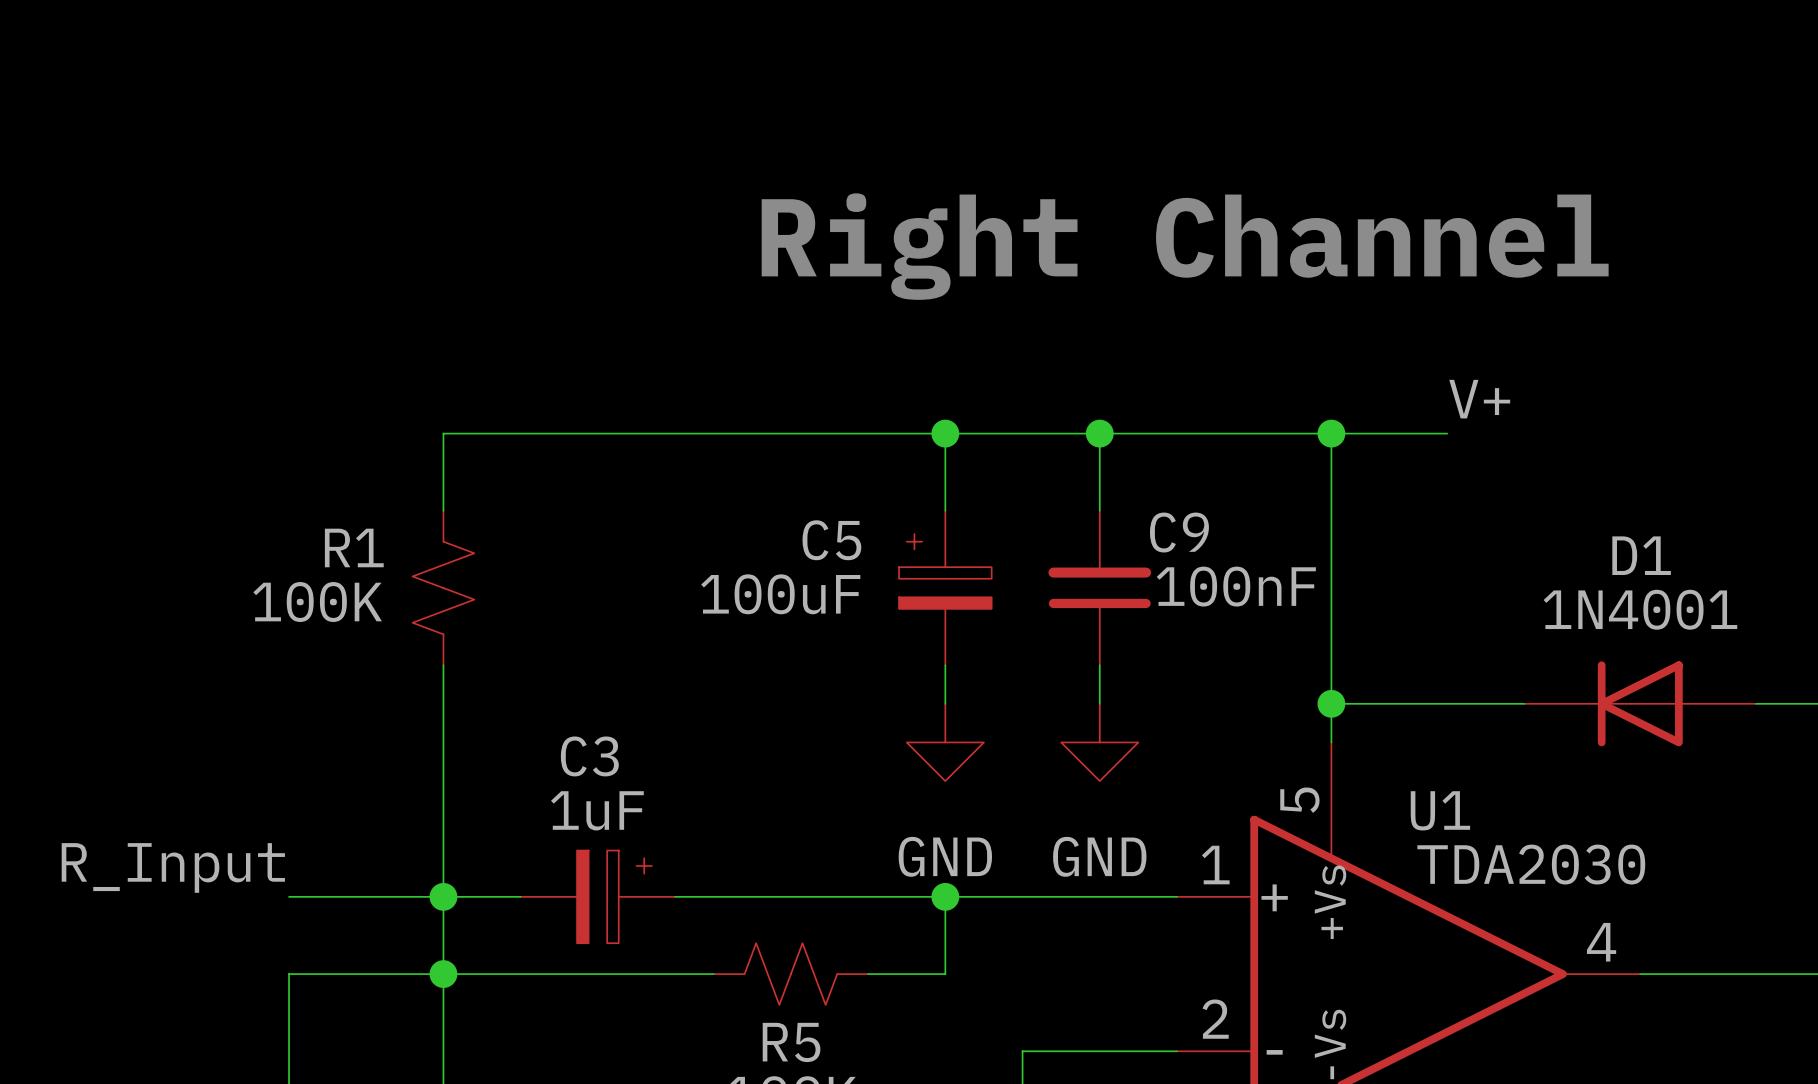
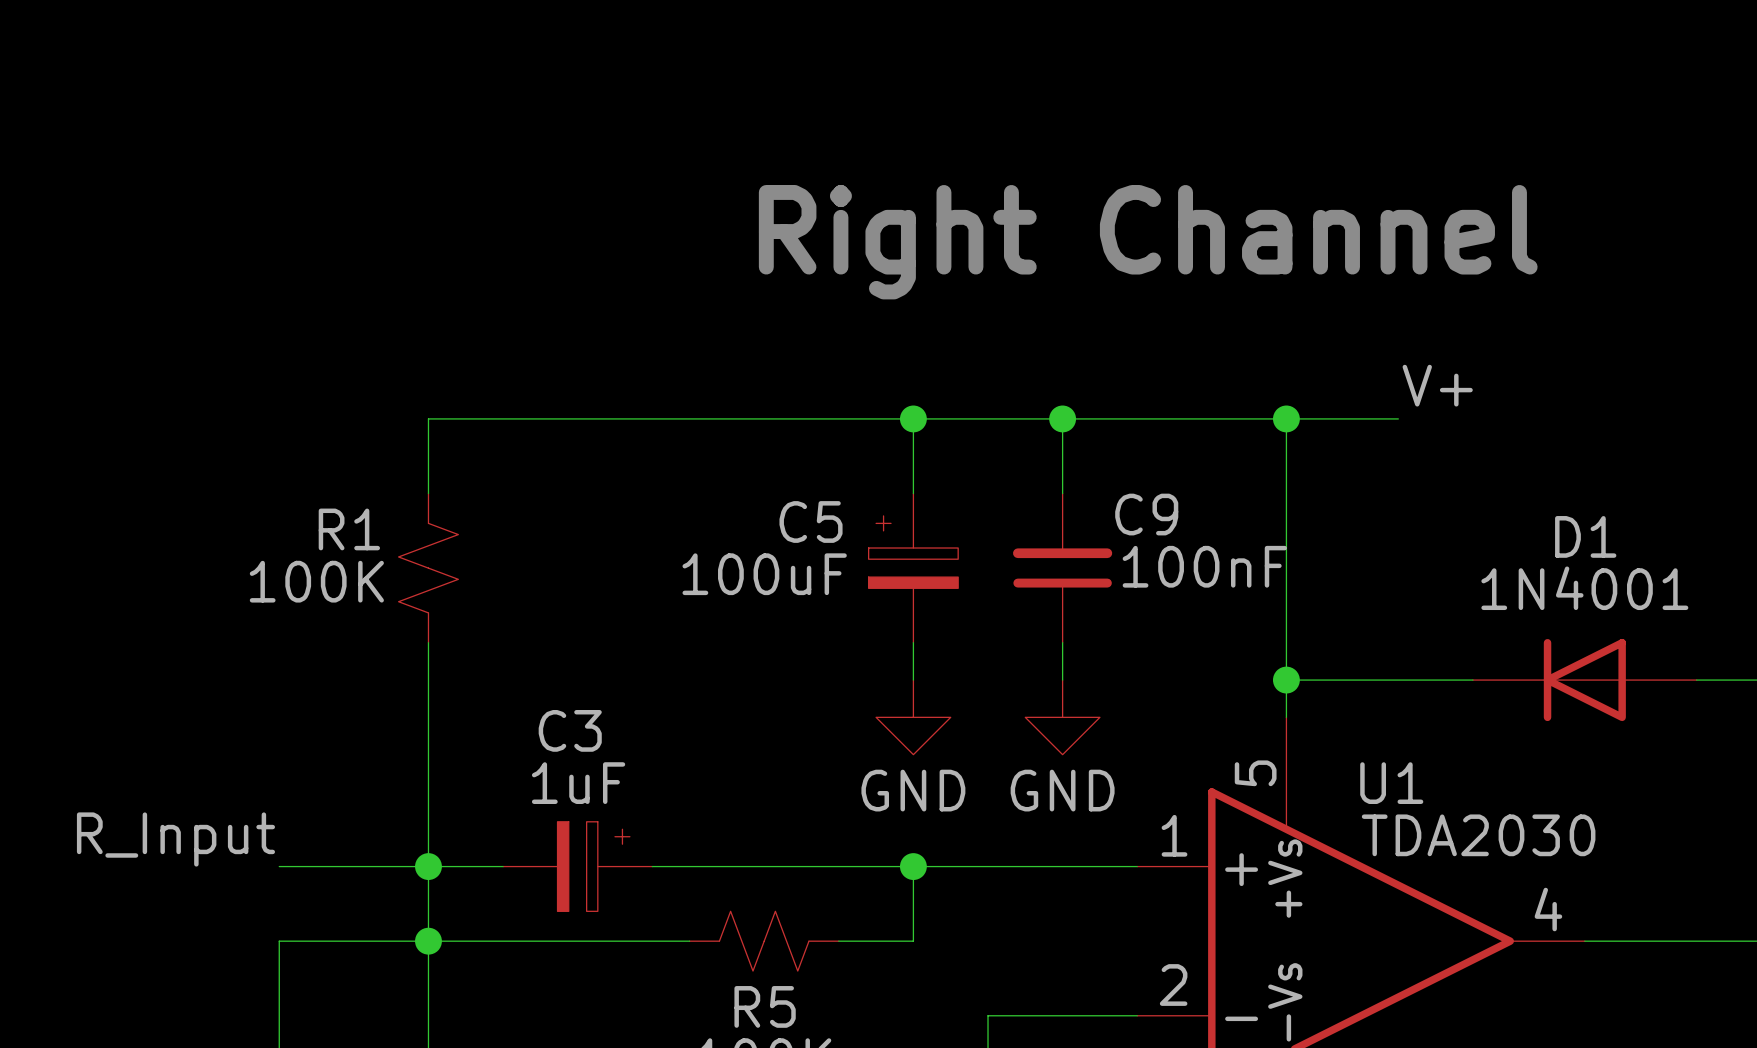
power symbol text position: GND (945, 856) -> GND (913, 790)
power symbol text position: GND (1099, 856) -> GND (1062, 790)

